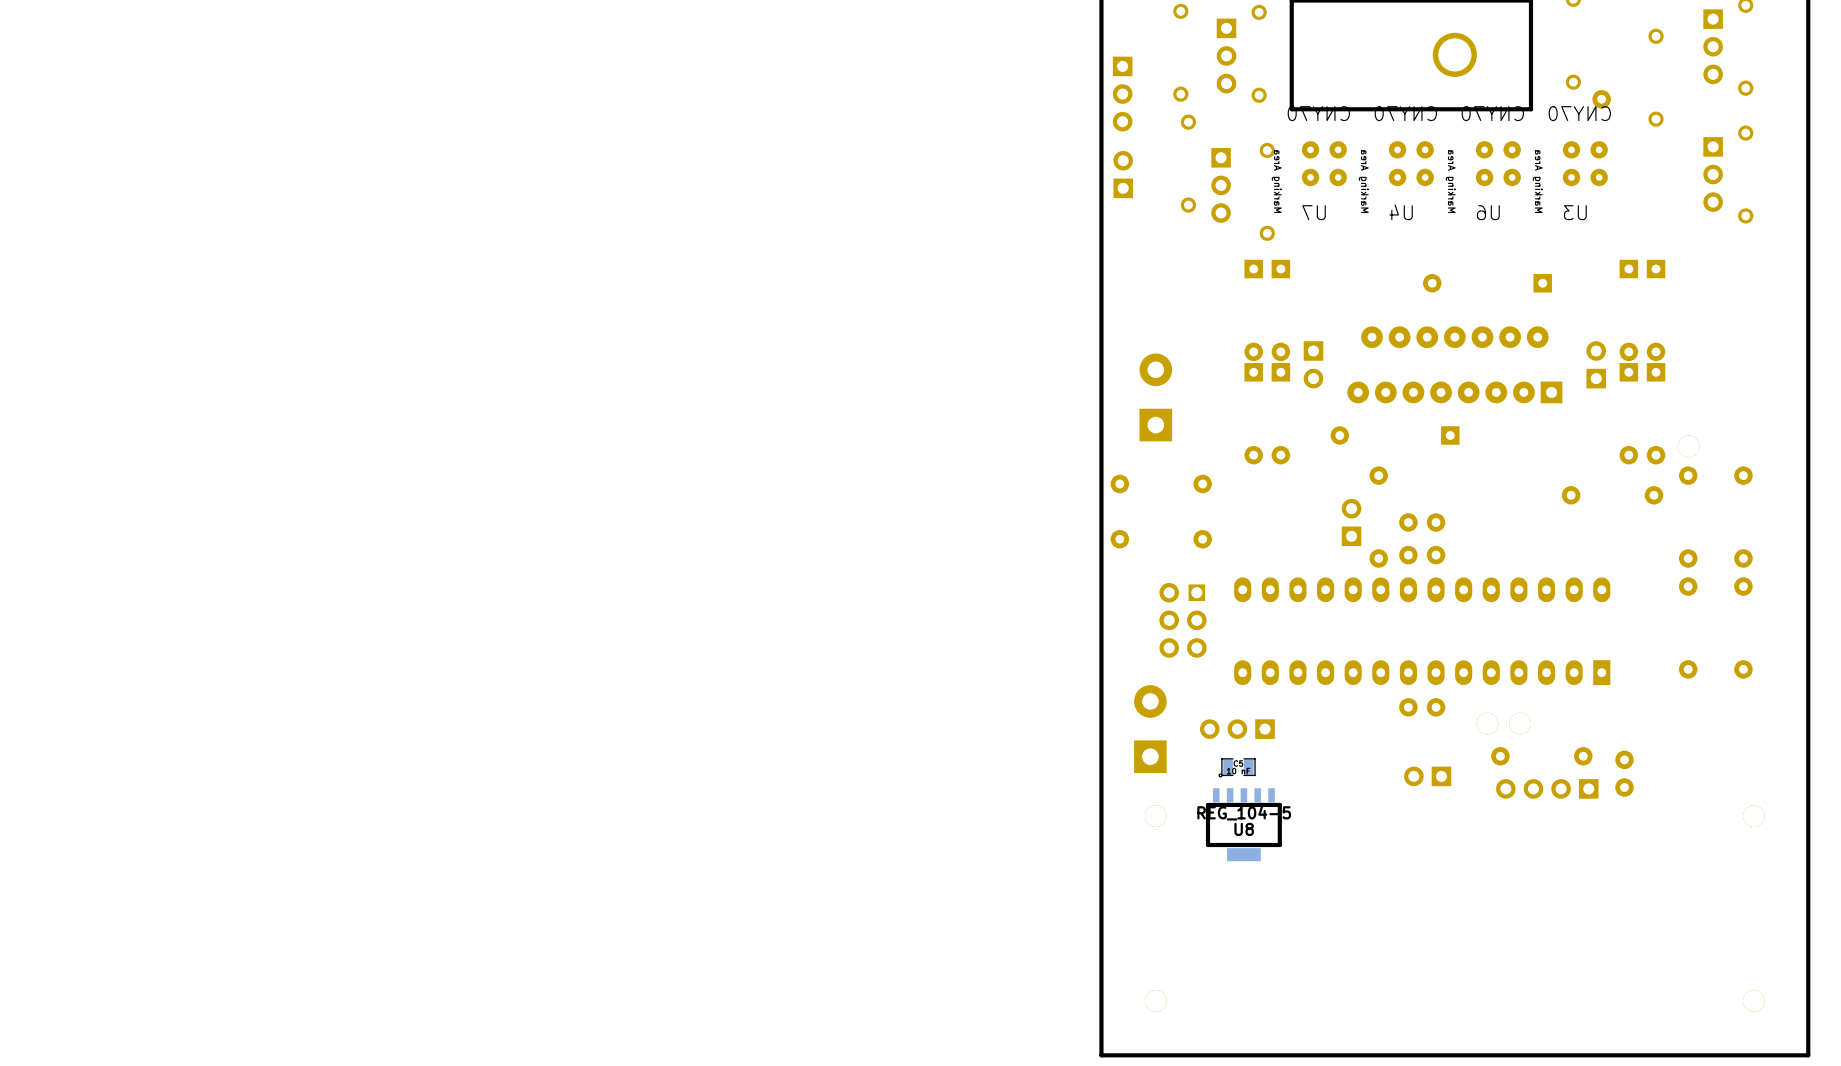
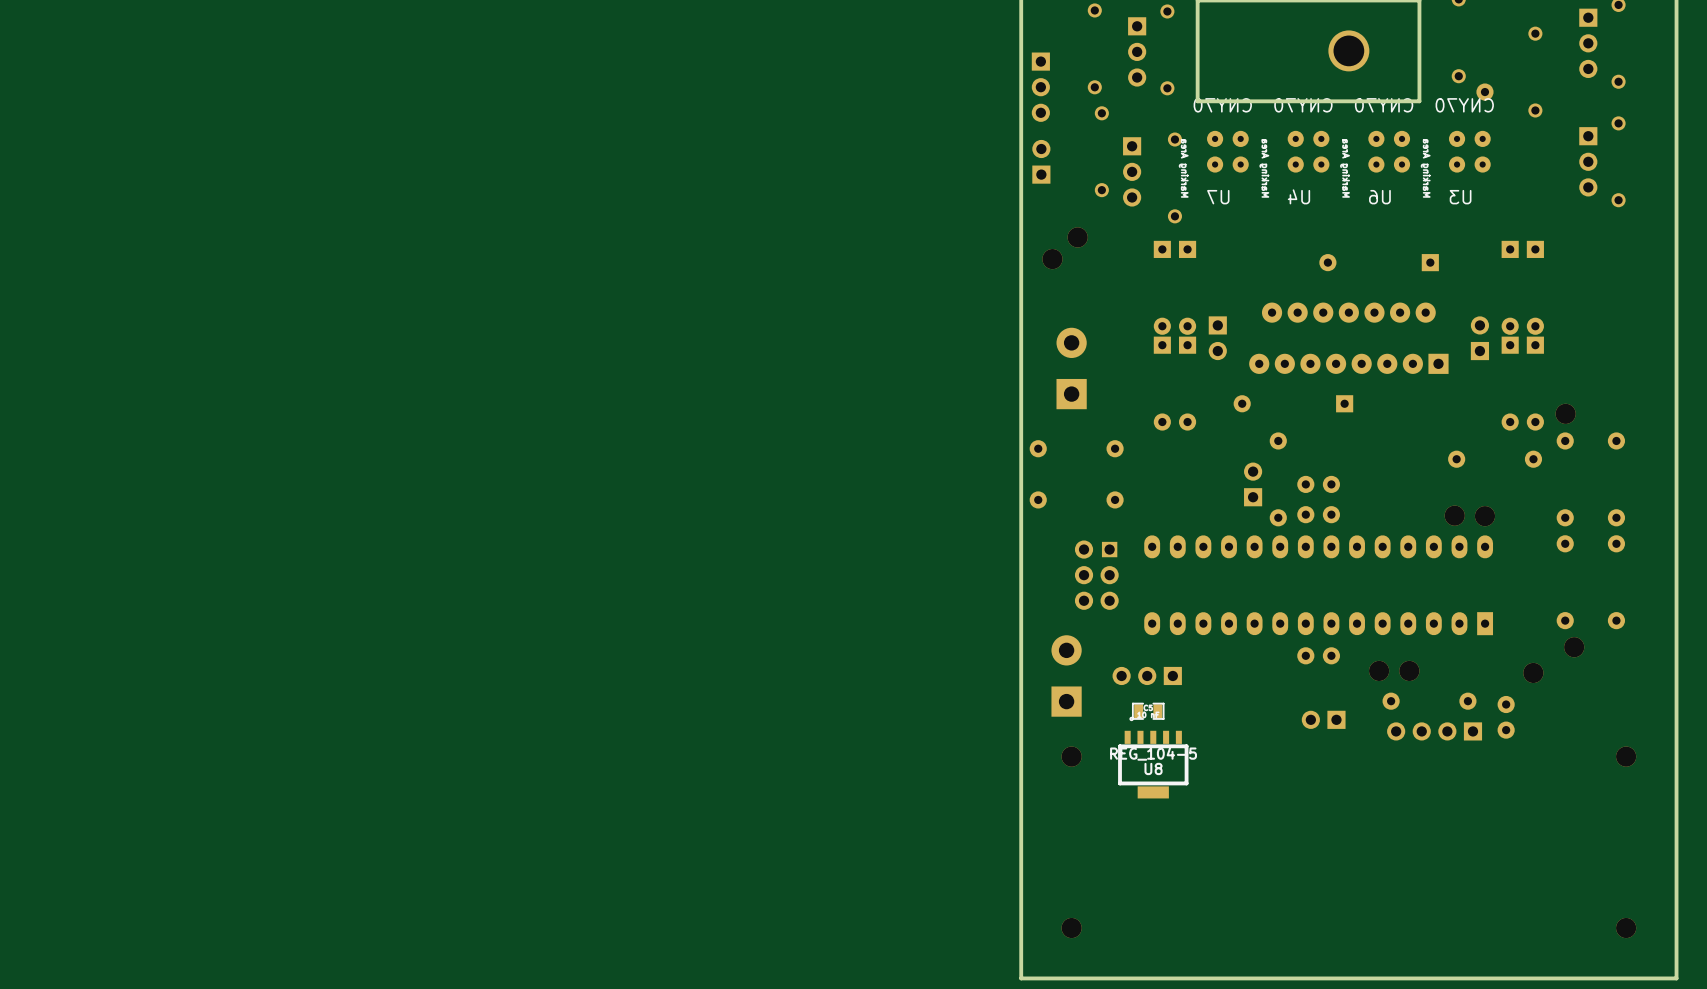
part: none -> (1077, 237)
part: none -> (1052, 259)
part: none -> (1454, 515)
part: none -> (1484, 516)
part: none -> (1574, 647)
part: none -> (1533, 672)

